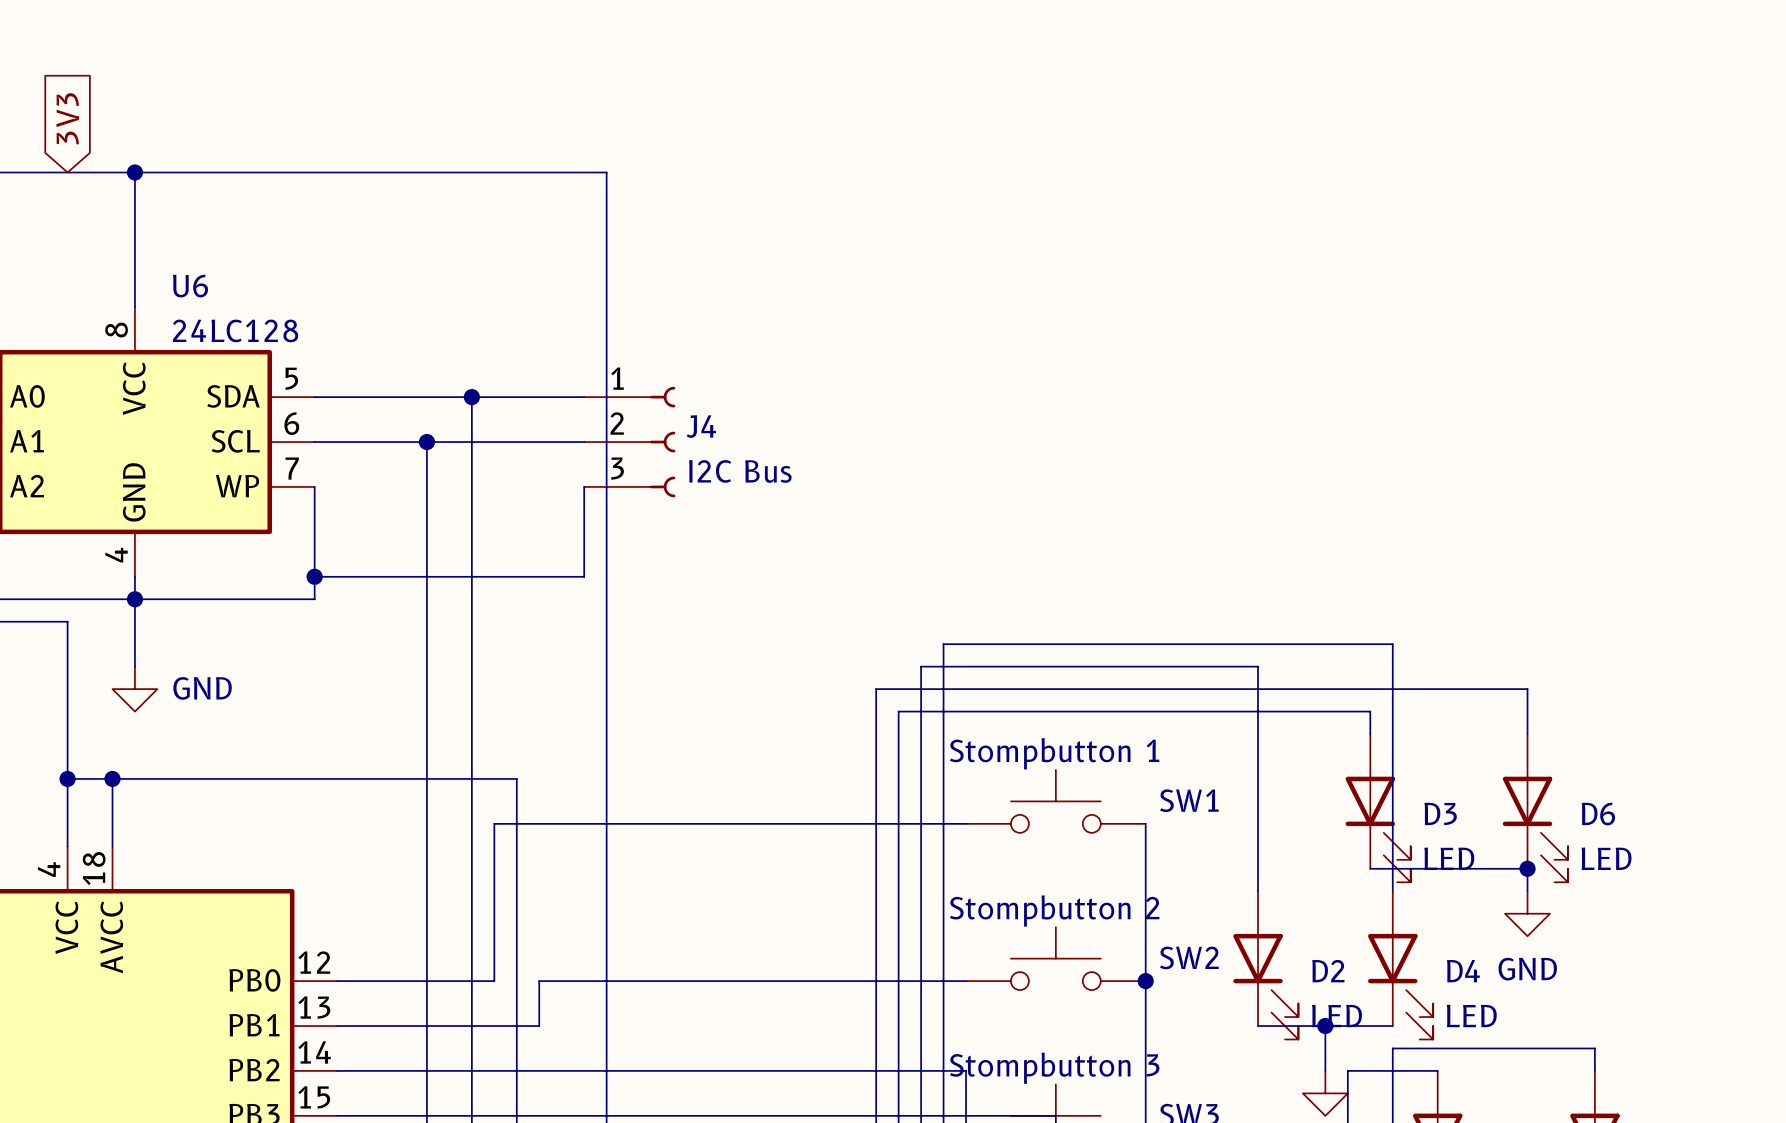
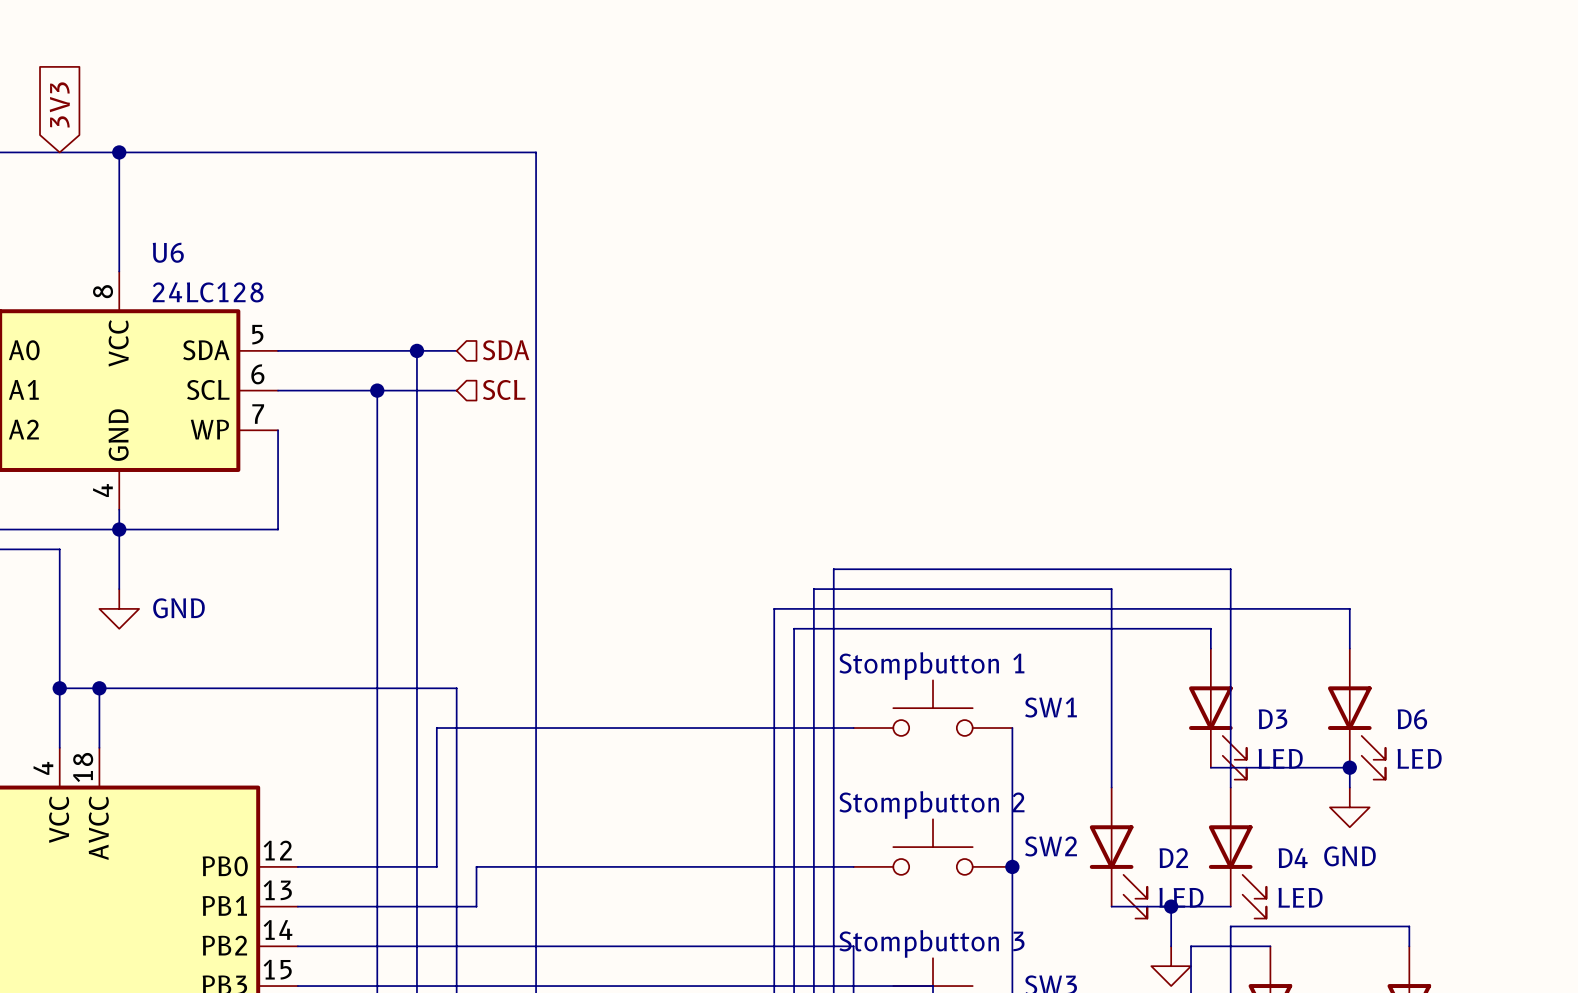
hierarchical label: none -> SDA (506, 350)
wire: (516, 397) (584, 397) -> none
hierarchical label: none -> SCL (504, 389)
wire: (516, 442) (584, 442) -> none
J4: I2C Bus (629, 442) -> none
wire: (584, 486) (584, 576) (314, 576) -> none
junction: (314, 576) -> none

